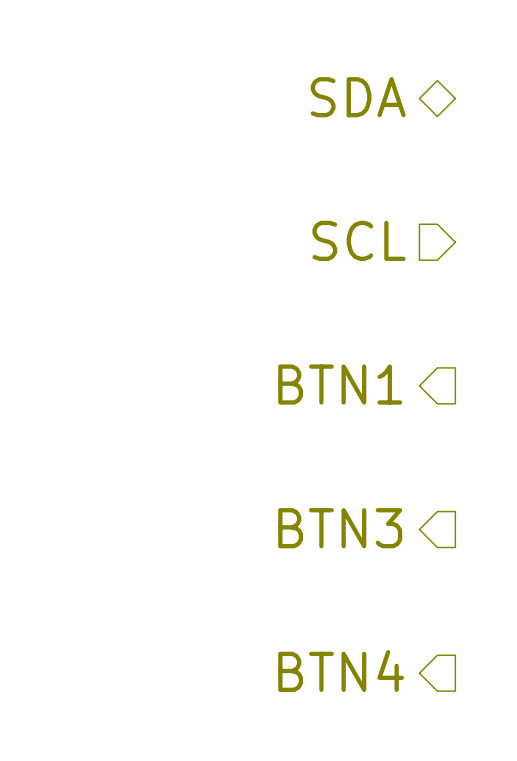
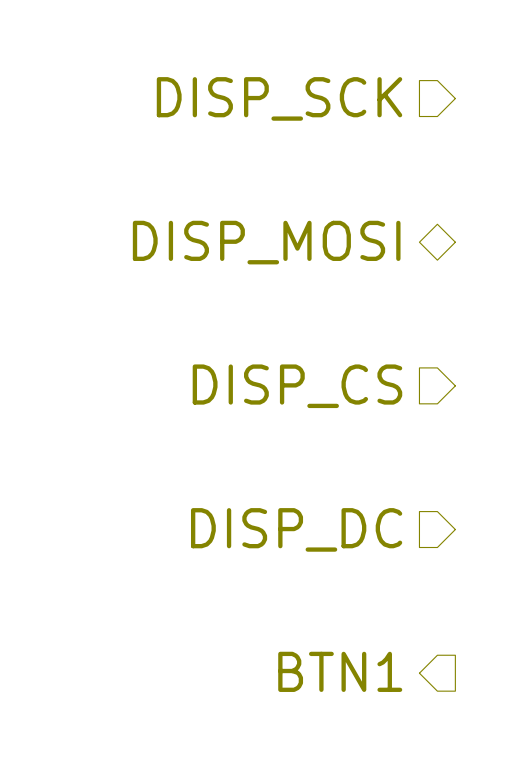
hierarchical label shape: bidirectional (358, 97) -> input (279, 98)
hierarchical label: SDA (358, 97) -> DISP_SCK (279, 98)
hierarchical label shape: input (359, 240) -> bidirectional (266, 242)
hierarchical label: SCL (359, 240) -> DISP_MOSI (266, 242)
hierarchical label shape: output (340, 384) -> input (297, 386)
hierarchical label: BTN1 (340, 384) -> DISP_CS (297, 386)
hierarchical label shape: output (340, 528) -> input (296, 529)
hierarchical label: BTN3 (340, 528) -> DISP_DC (296, 529)
hierarchical label: BTN4 (341, 671) -> BTN1 (340, 671)

